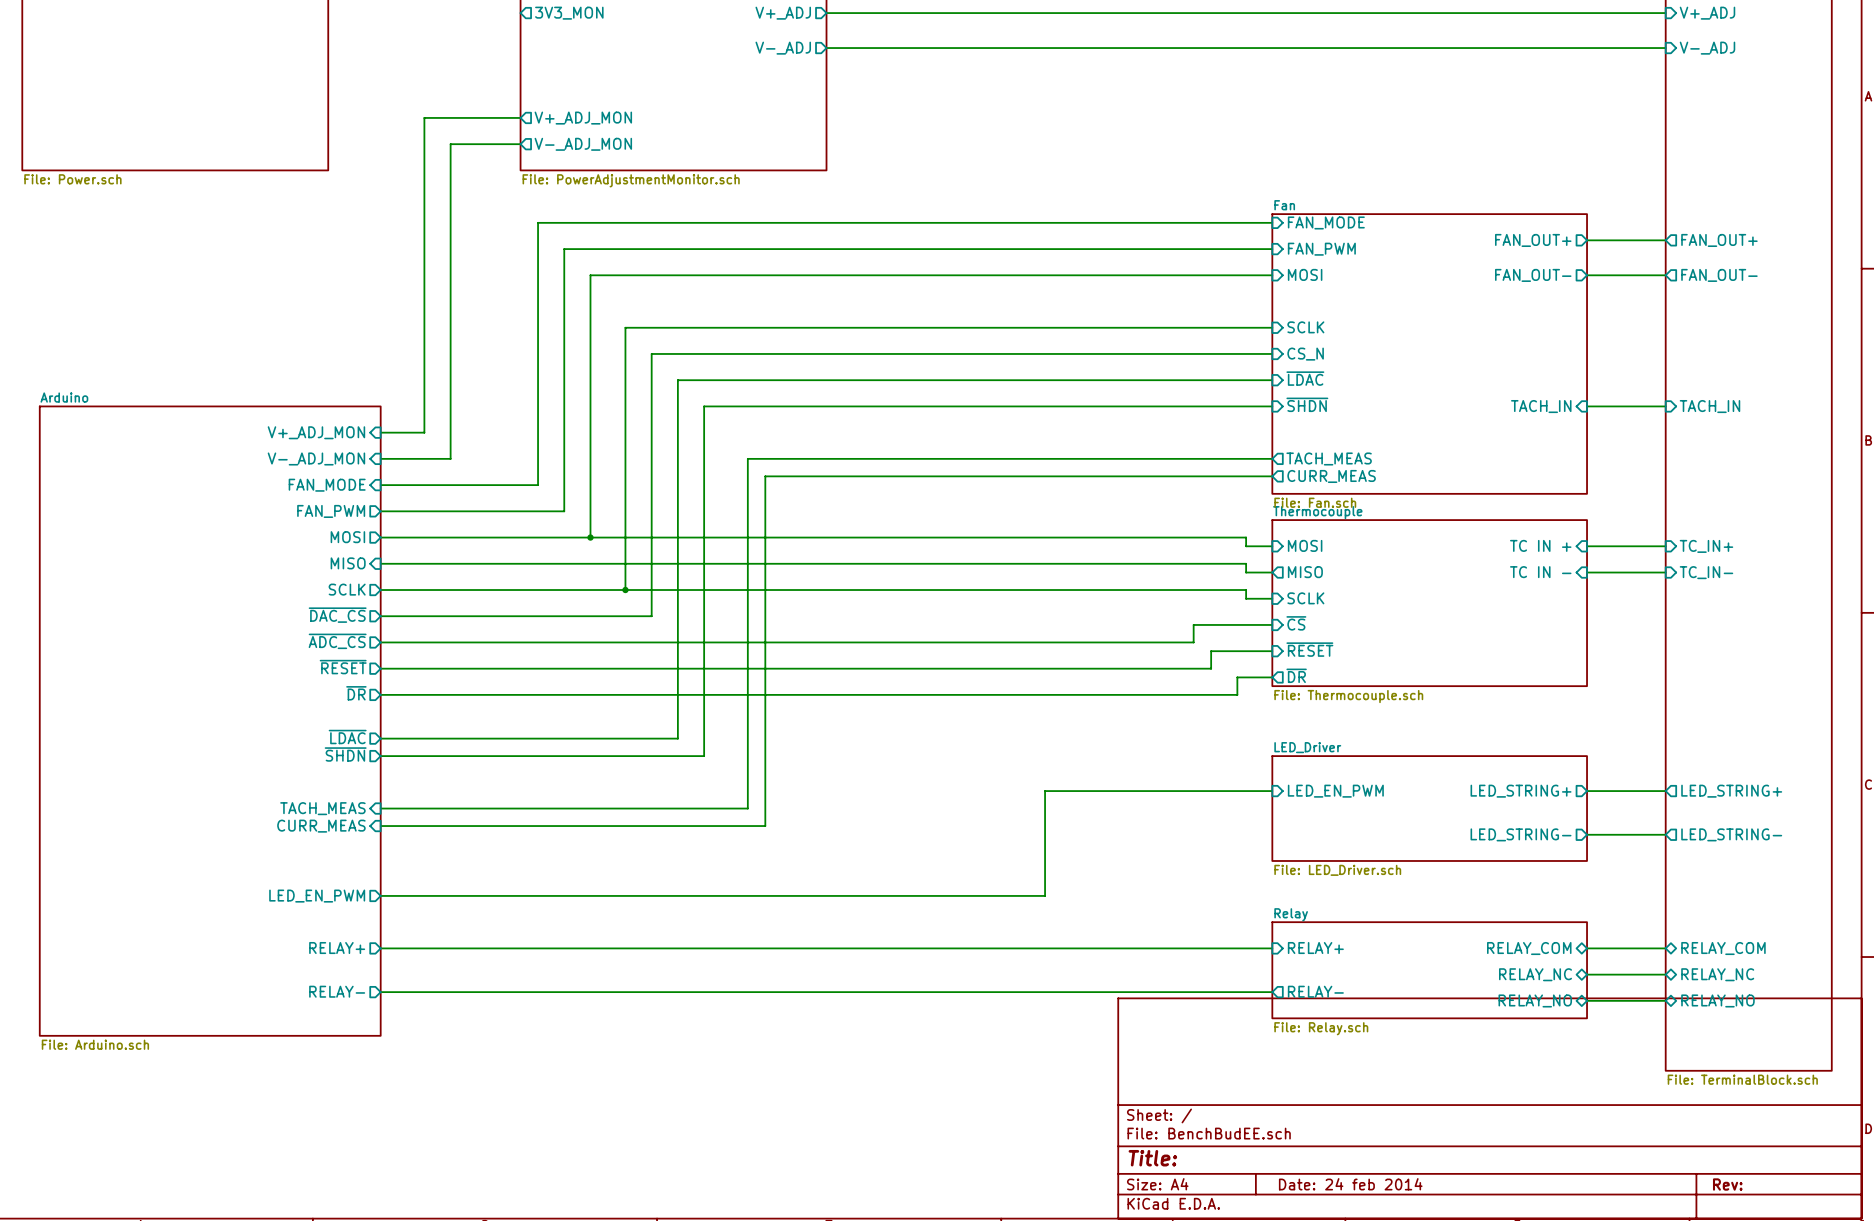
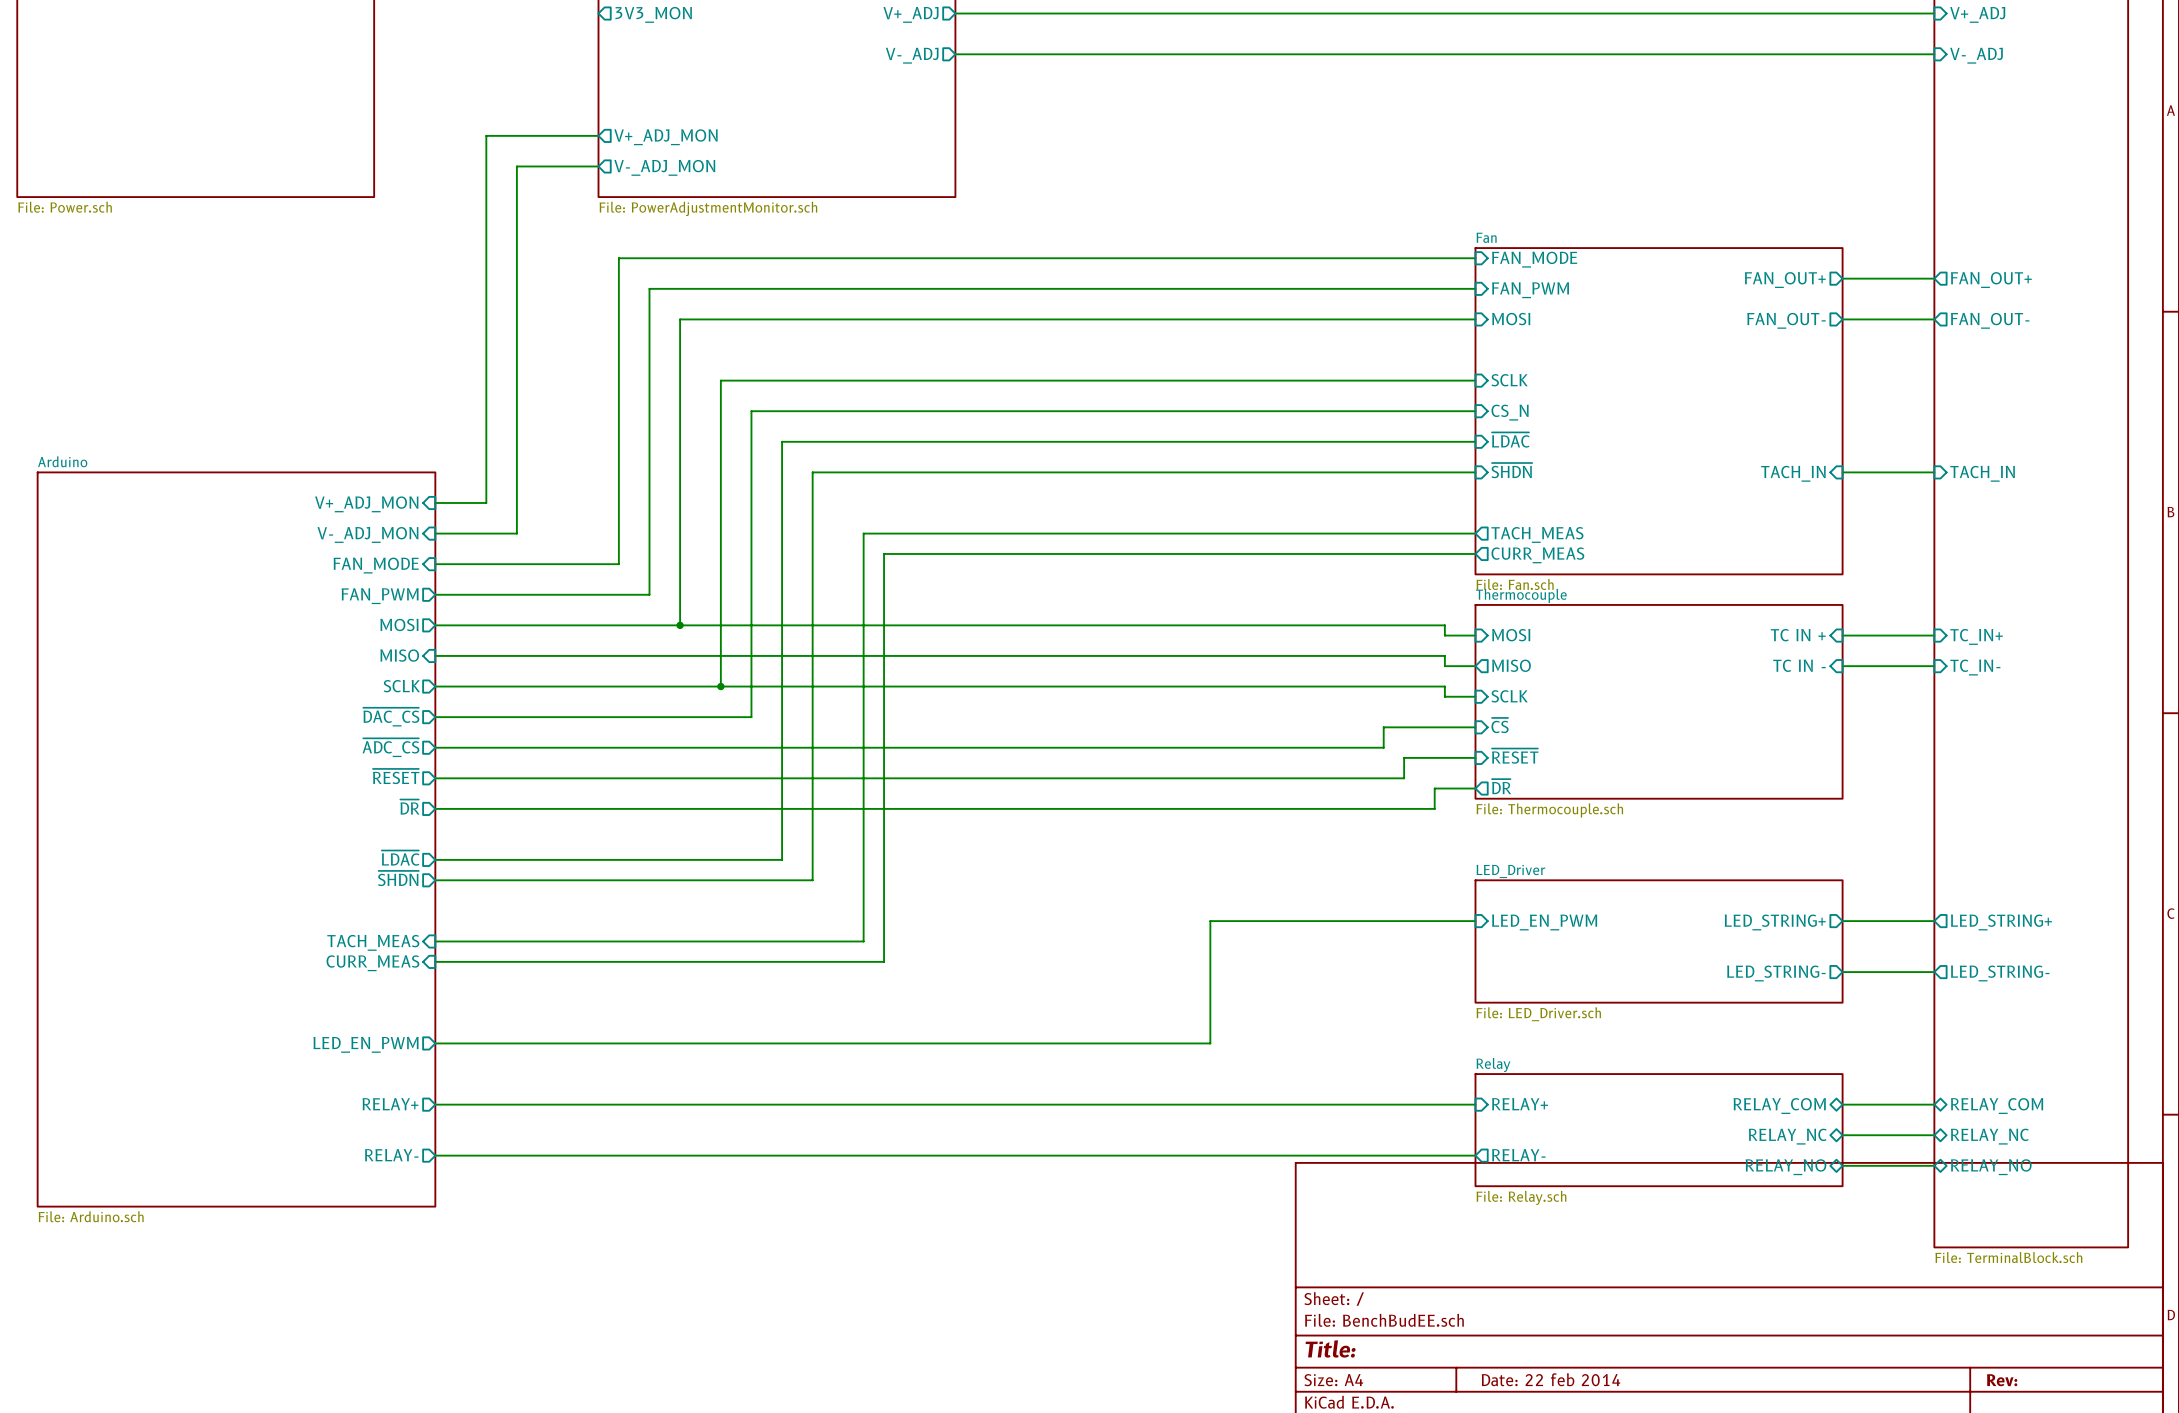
title block: Date: 24 feb 2014 (1350, 1184) -> Date: 22 feb 2014 (1551, 1379)

